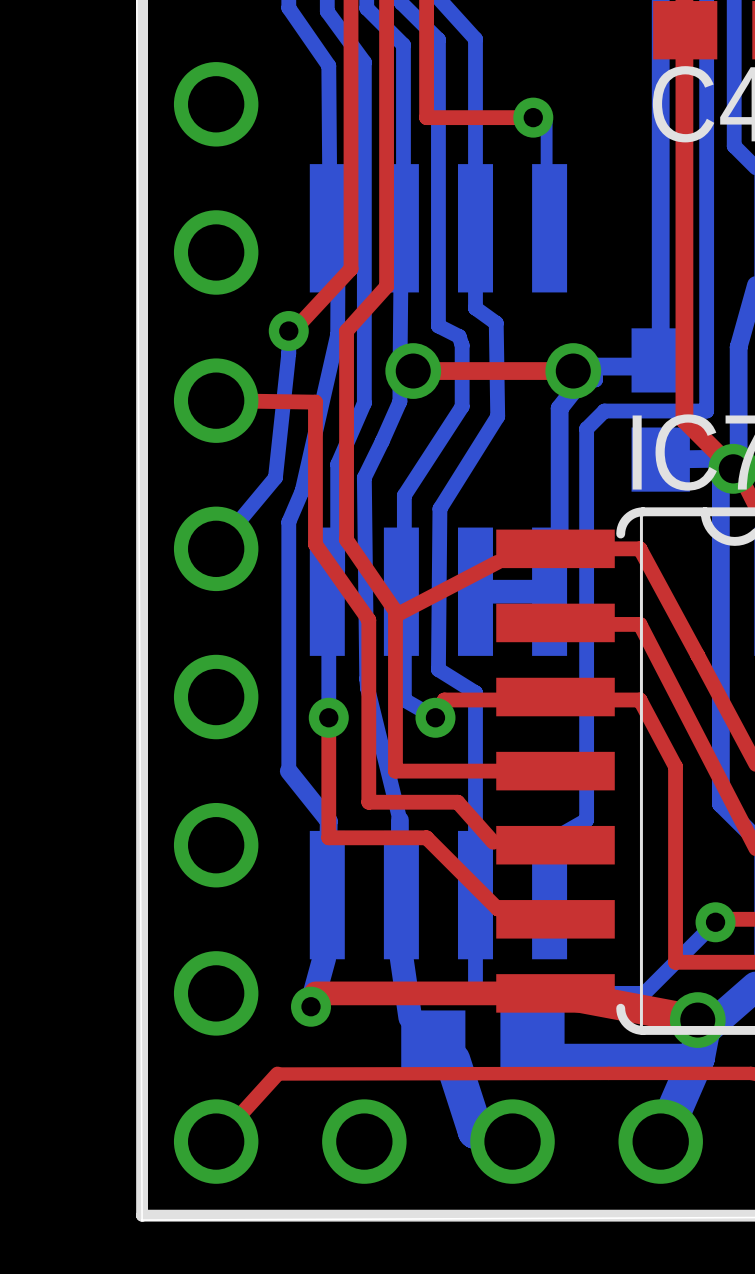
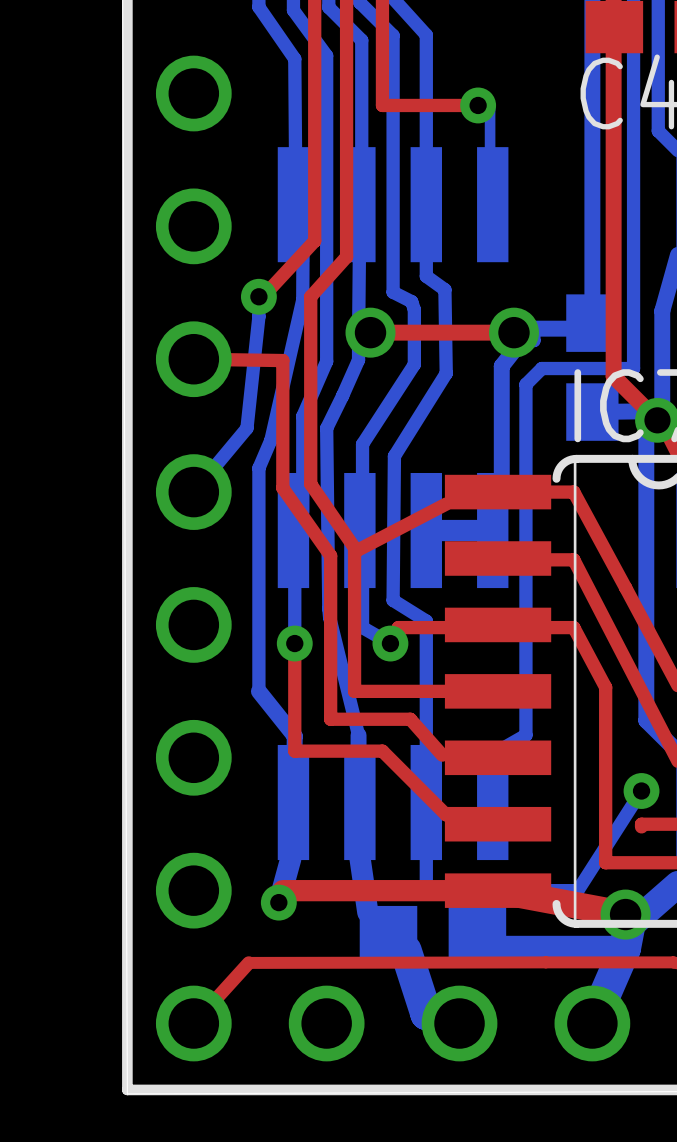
bottom track: (715, 922) (644, 993) -> (641, 791) (577, 890)
via position: (715, 922) -> (641, 791)

